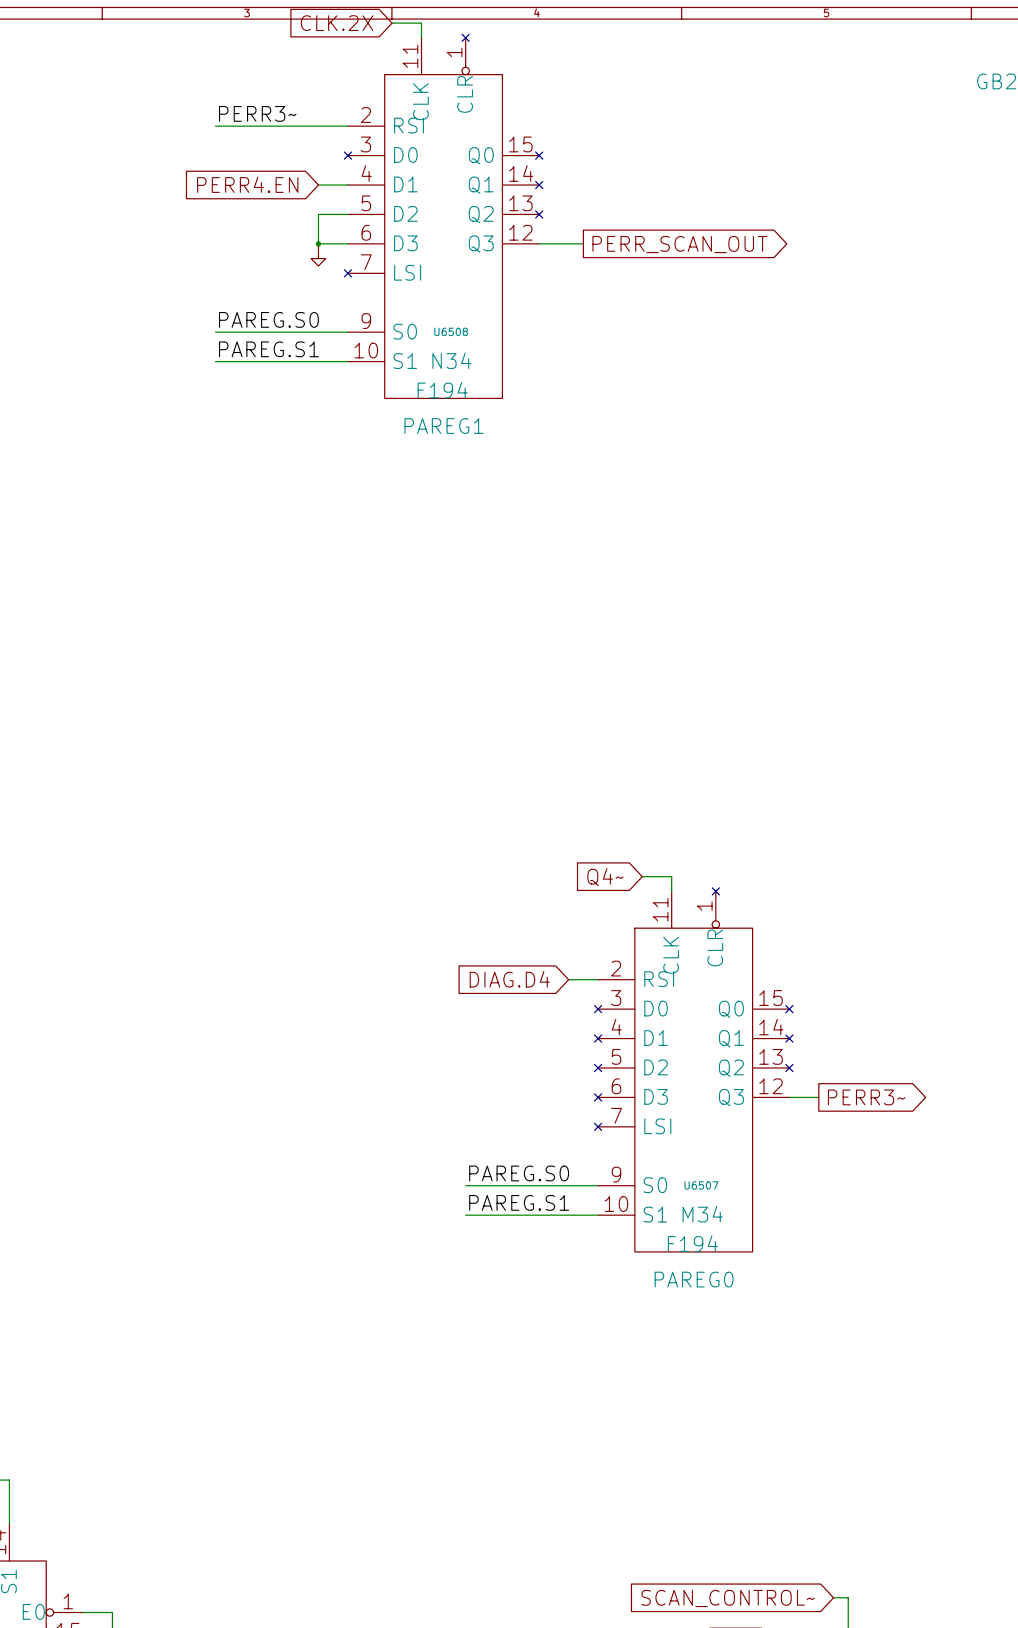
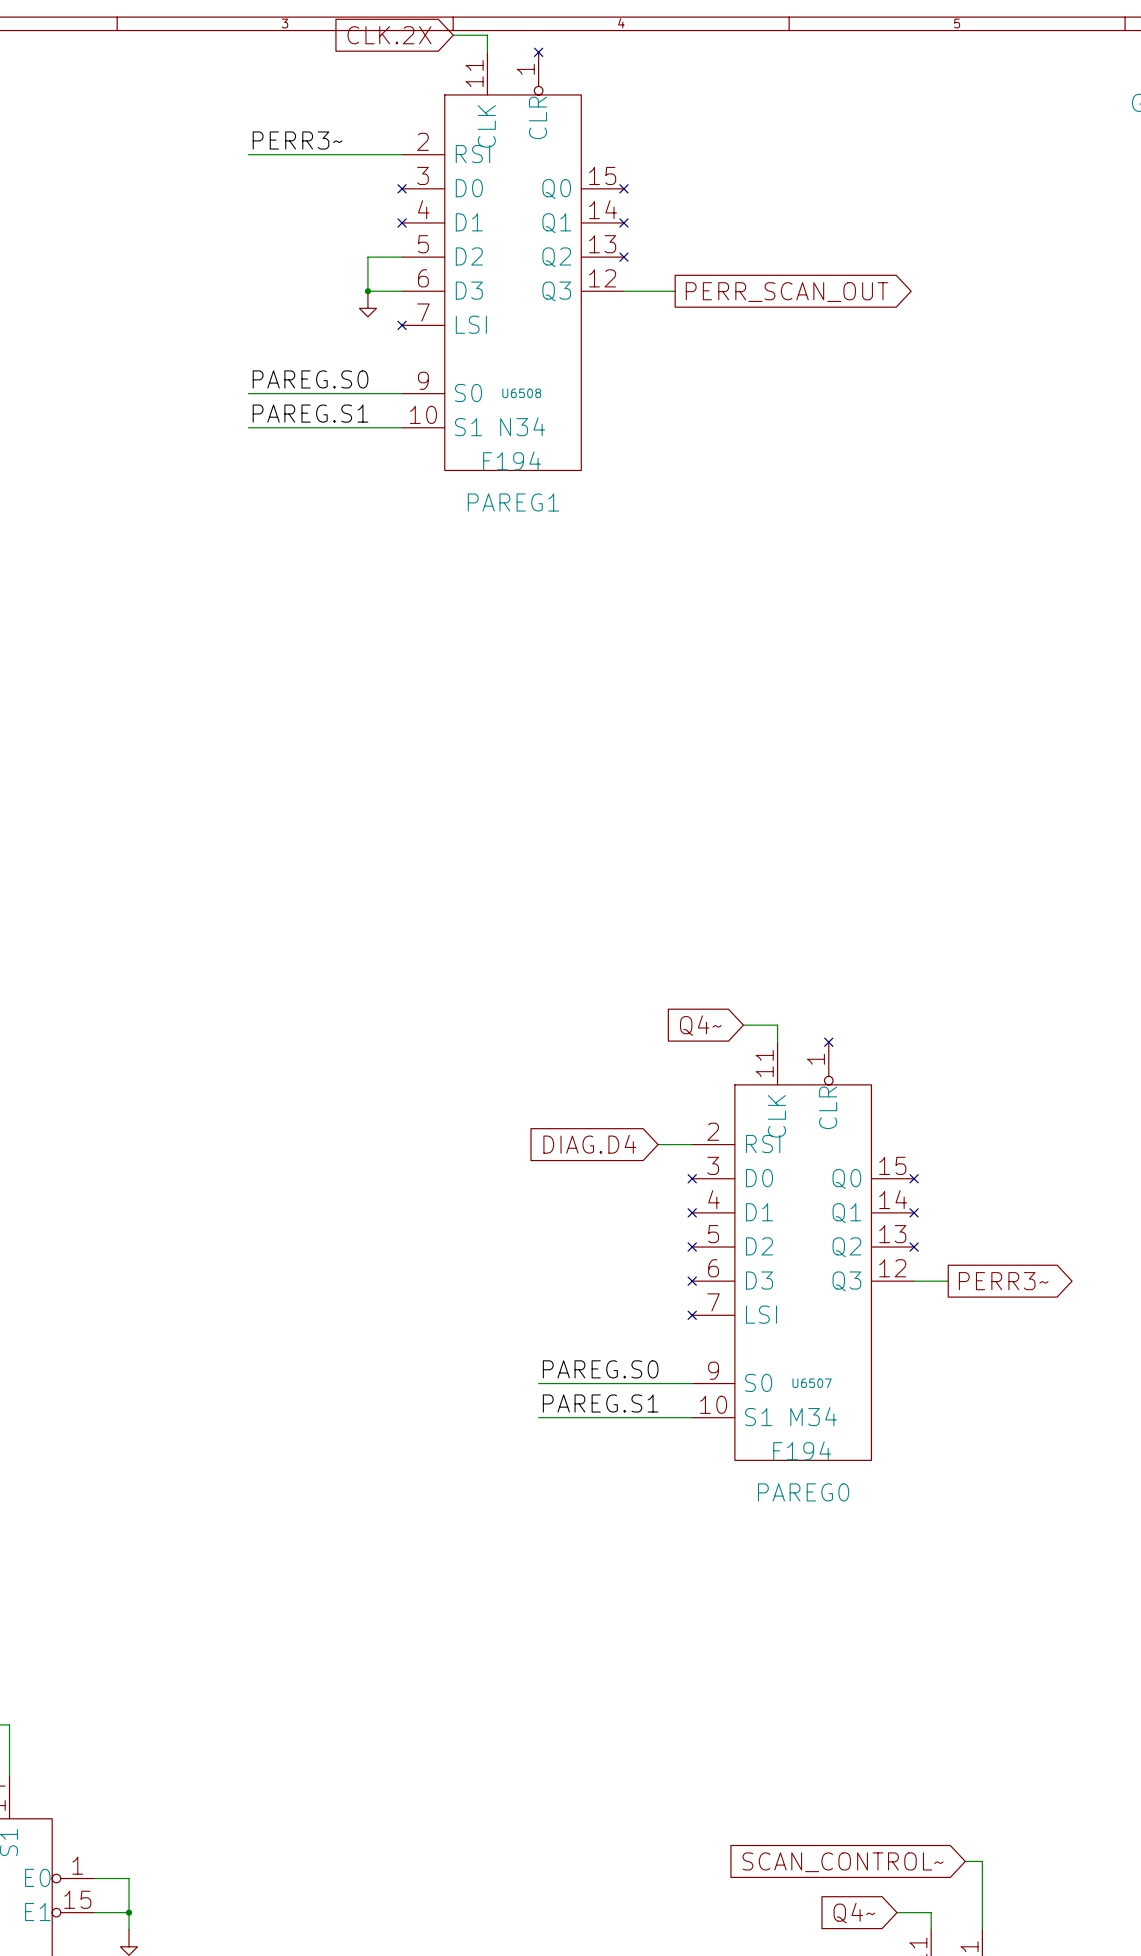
global label: PERR4.EN (247, 184) -> none
wire: (318, 185) (347, 185) -> none
no-connect mark: none -> (402, 222)

